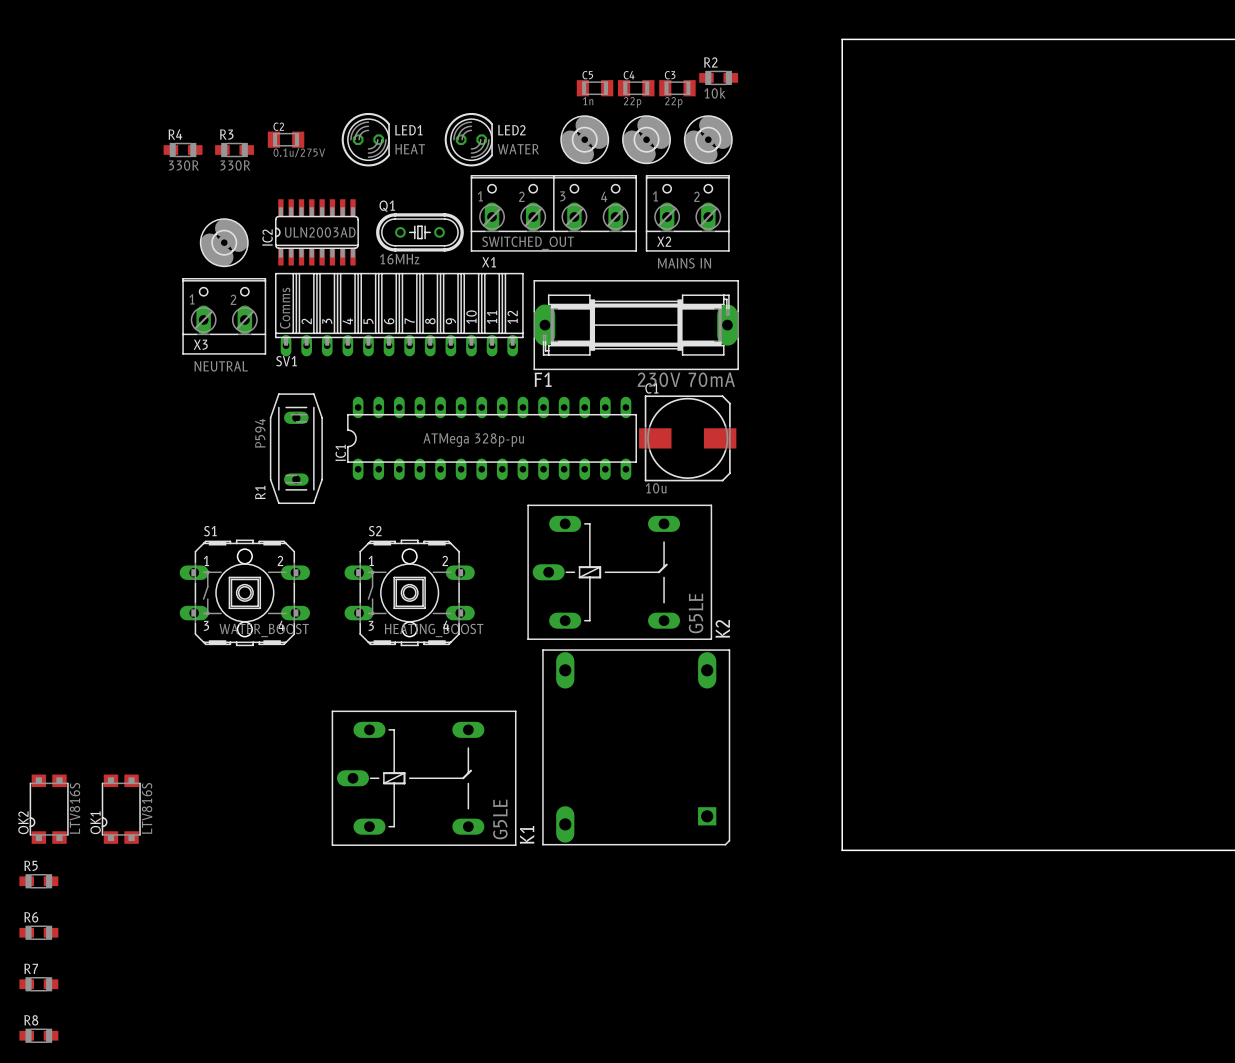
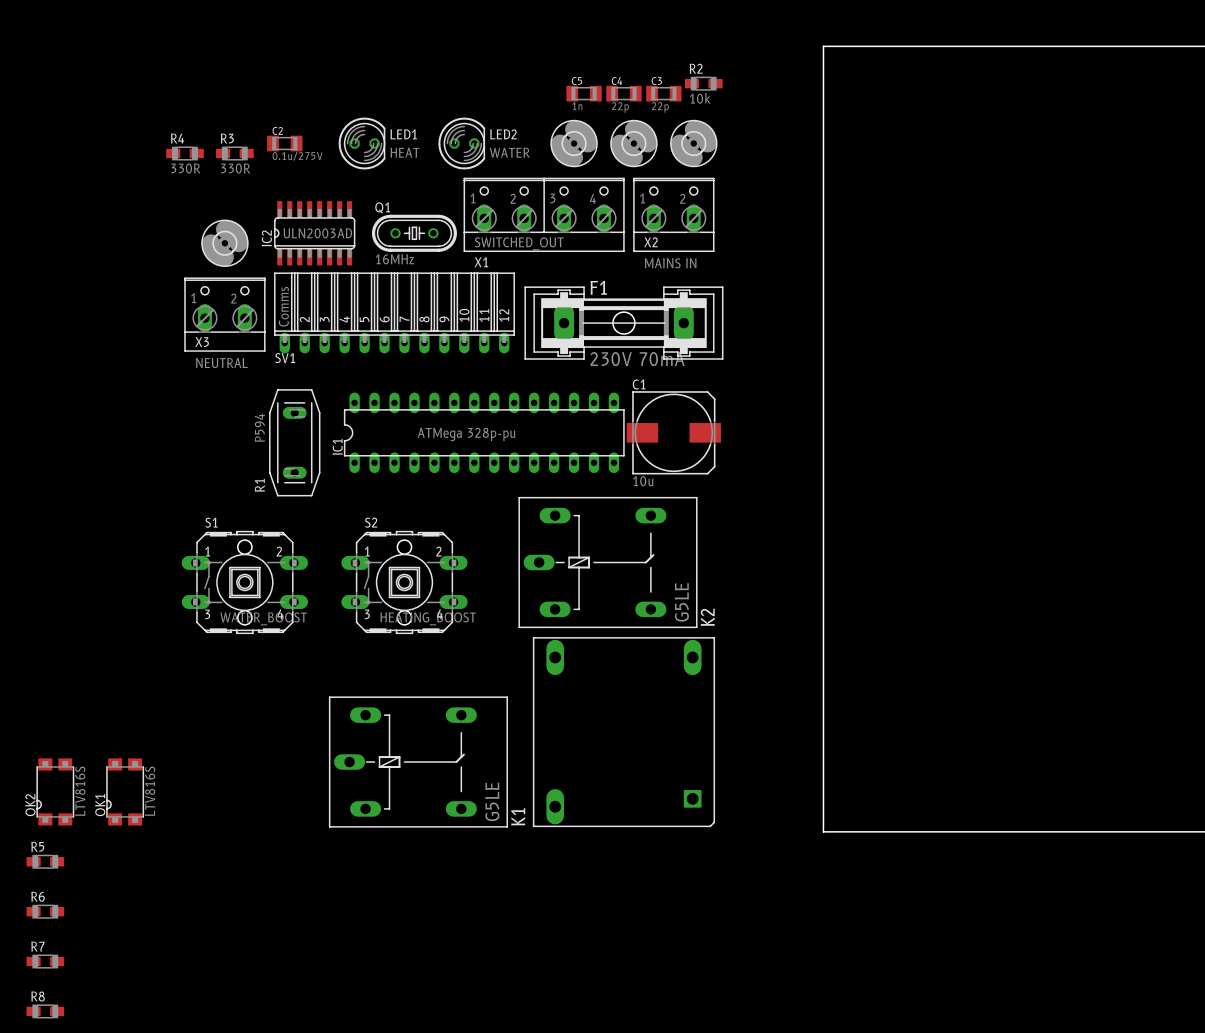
F1 footprint: [533, 280, 739, 371] -> [524, 286, 724, 360]
F1 name position: F1 (543, 379) -> F1 (598, 287)
F1 value position: 230V 70mA (686, 379) -> 230V 70mA (637, 359)

